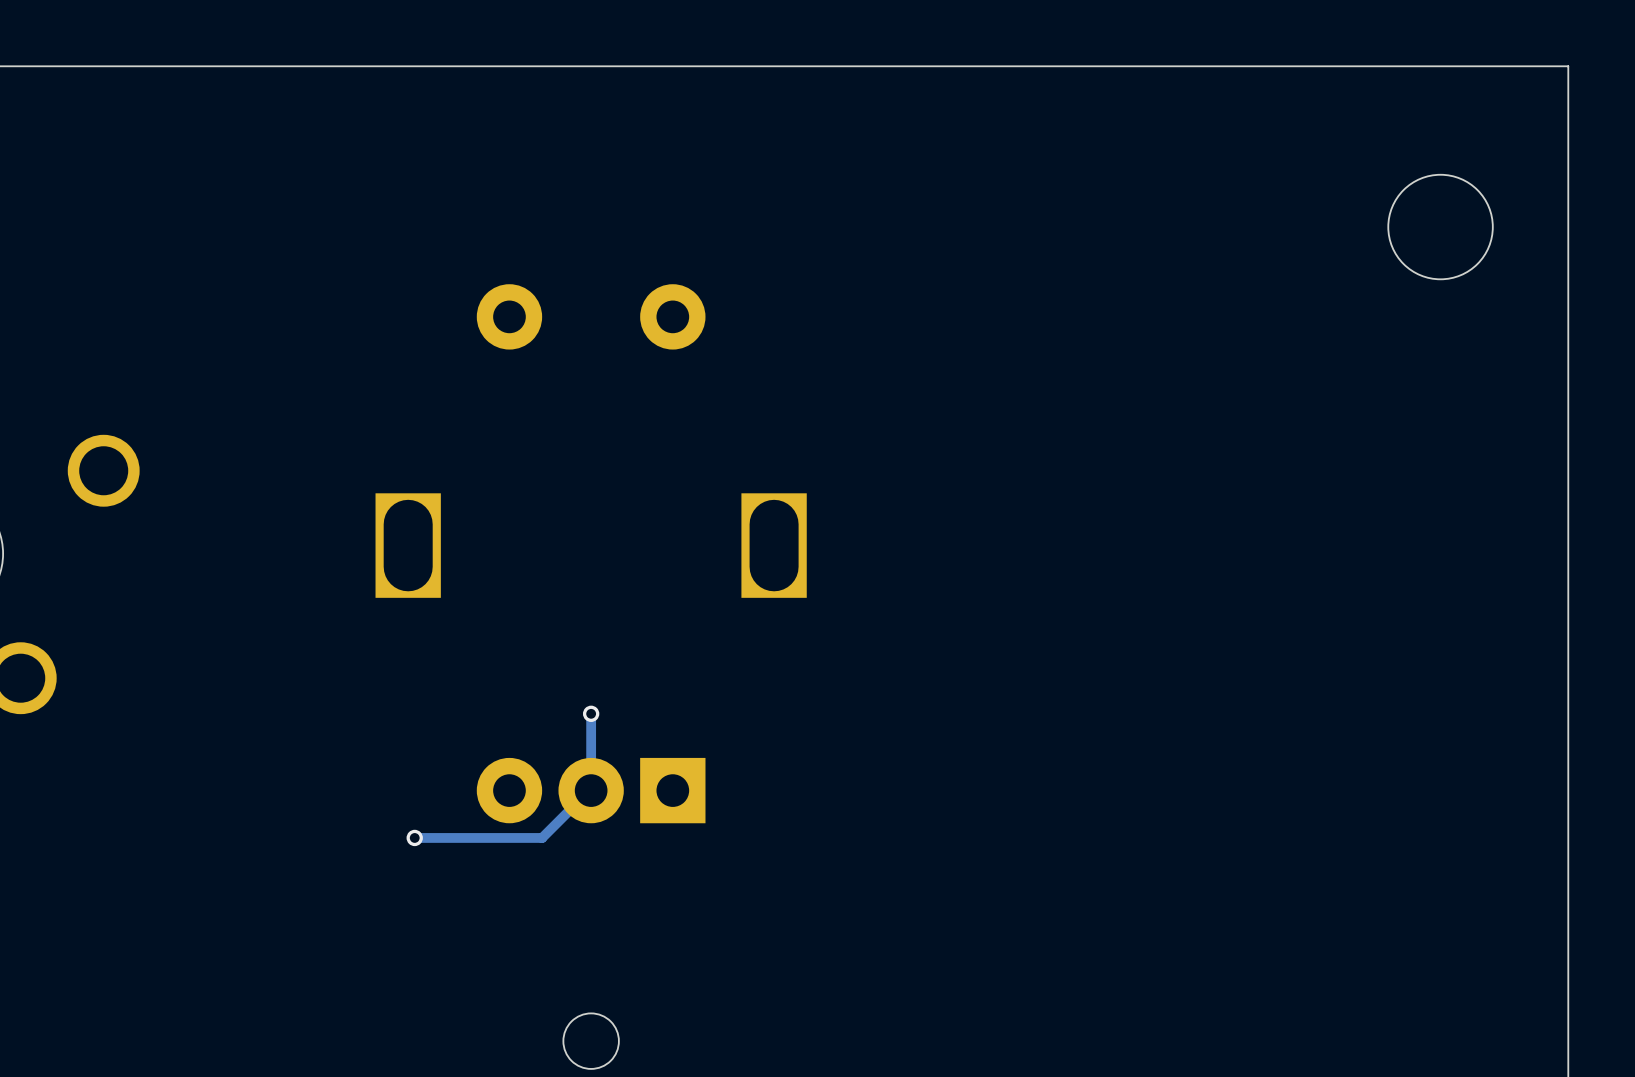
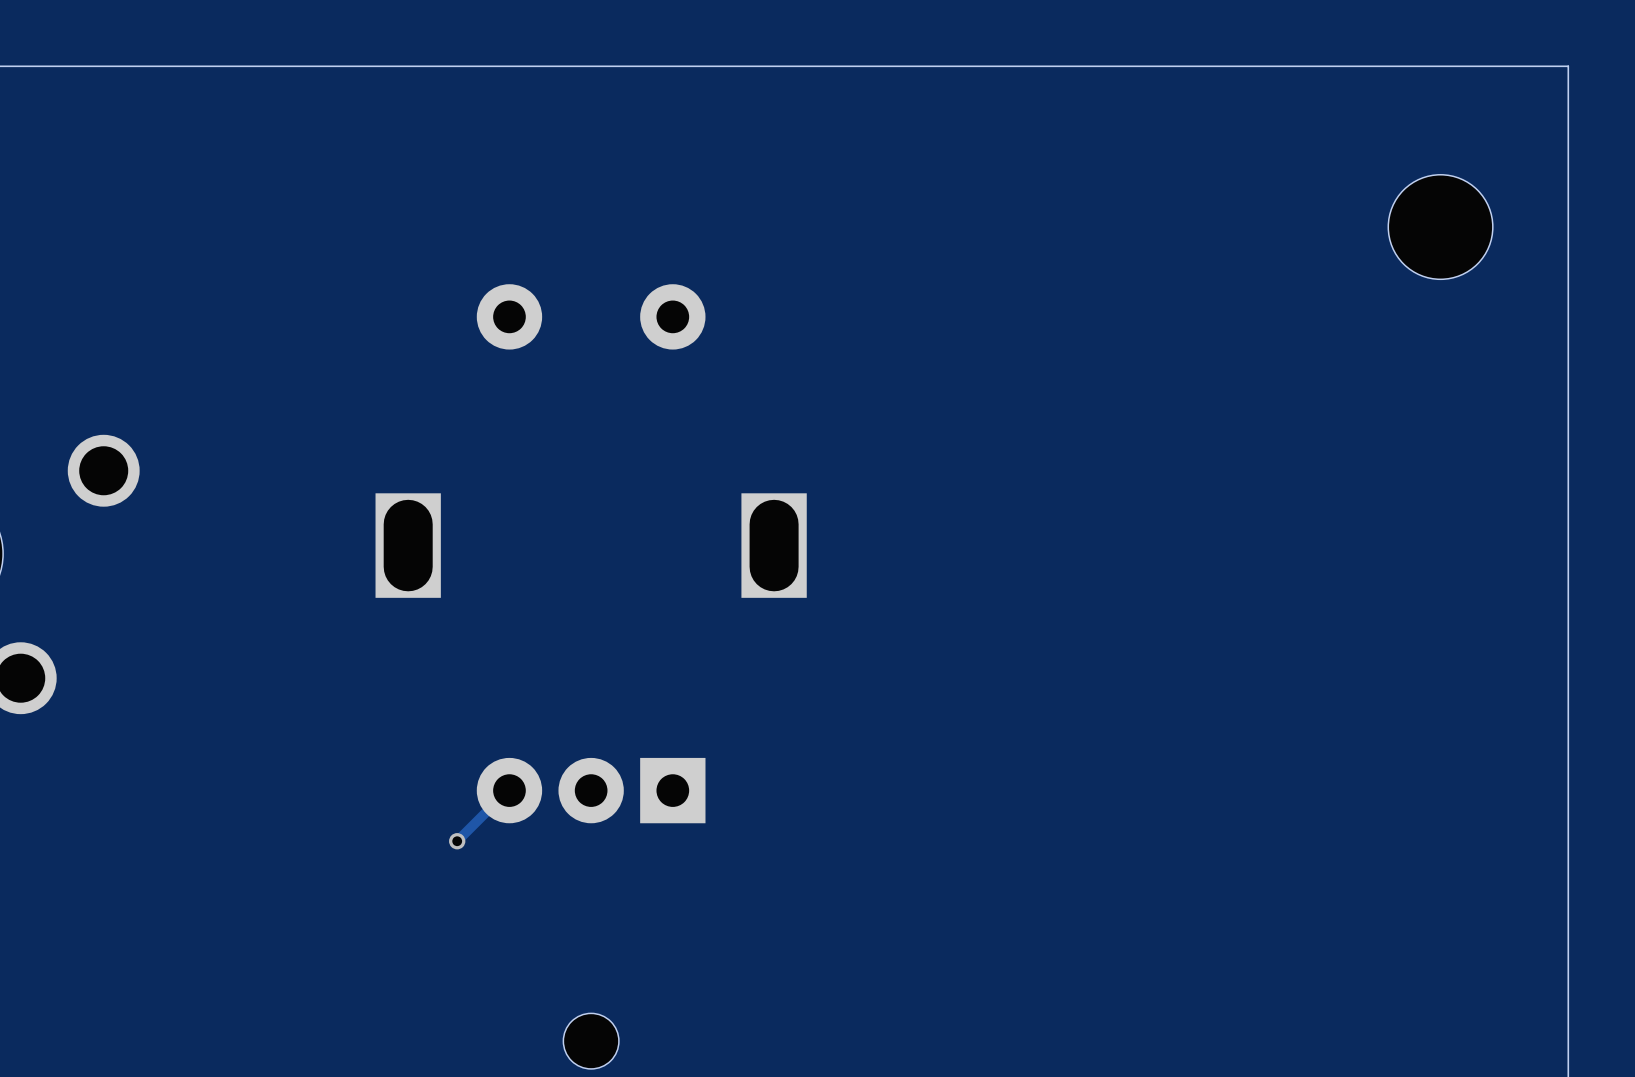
track: (591, 713) (591, 788) (542, 837) (414, 837) -> none
via: (591, 713) -> none
track: none -> (509, 788) (457, 841)
via position: (414, 837) -> (457, 841)

